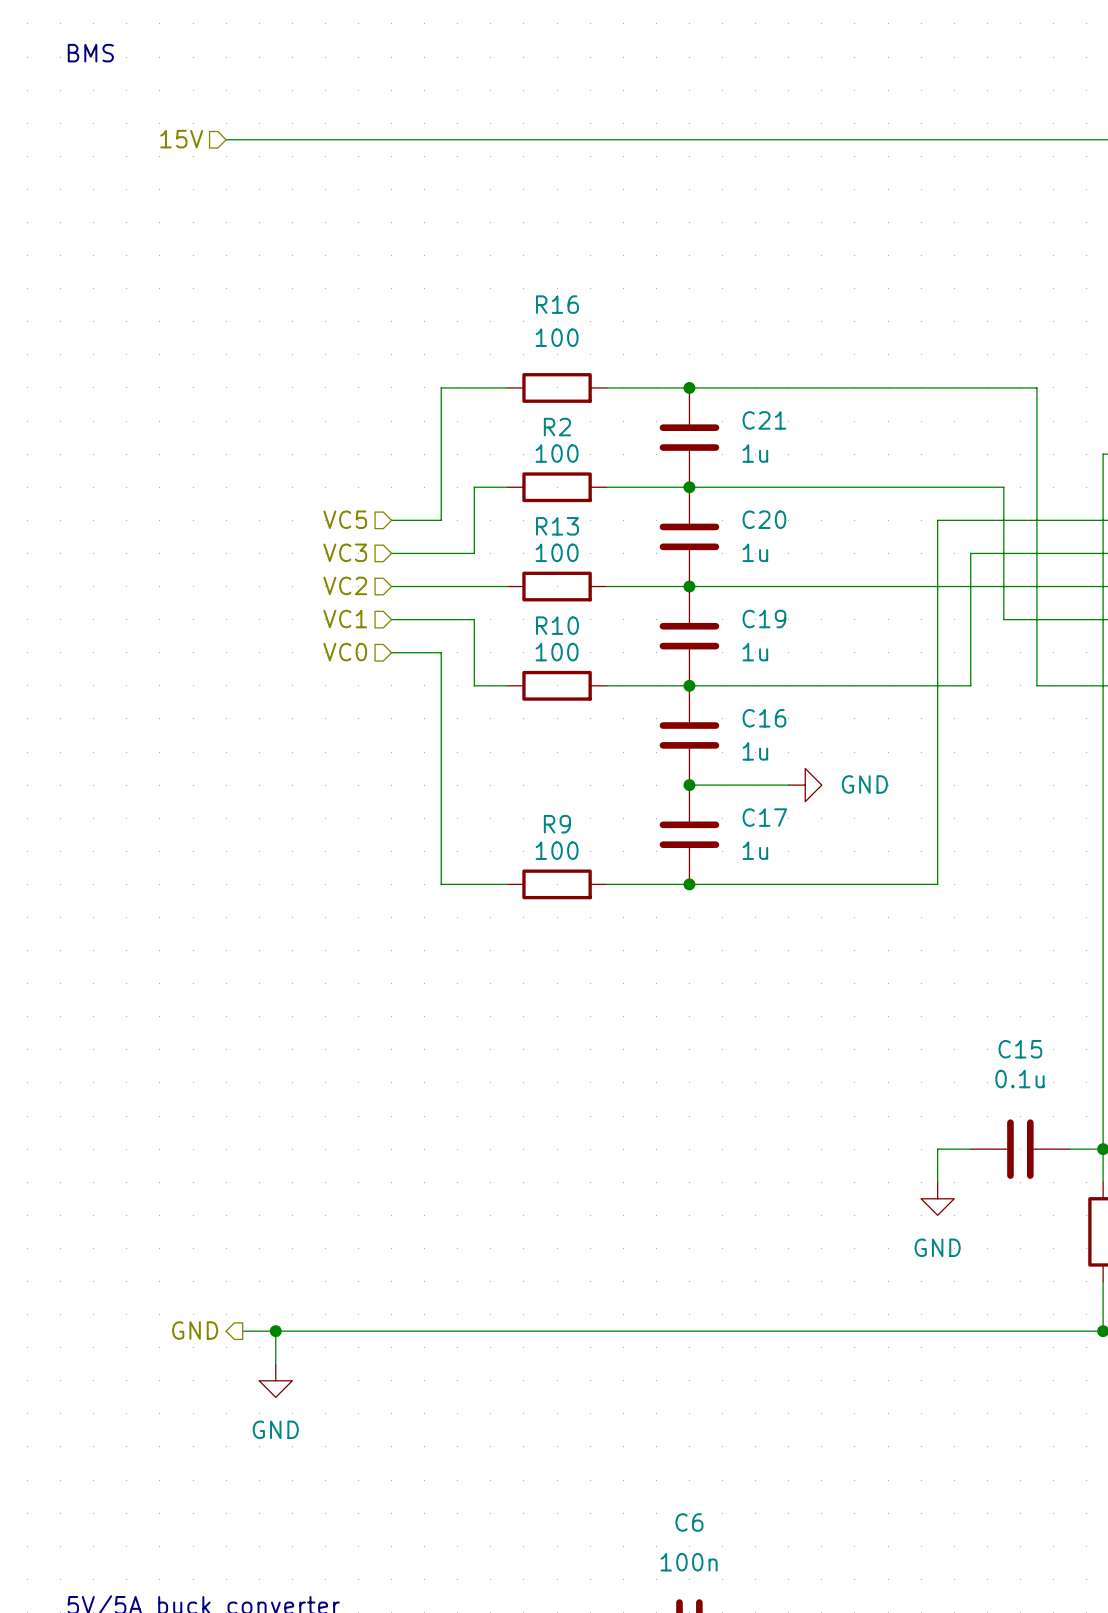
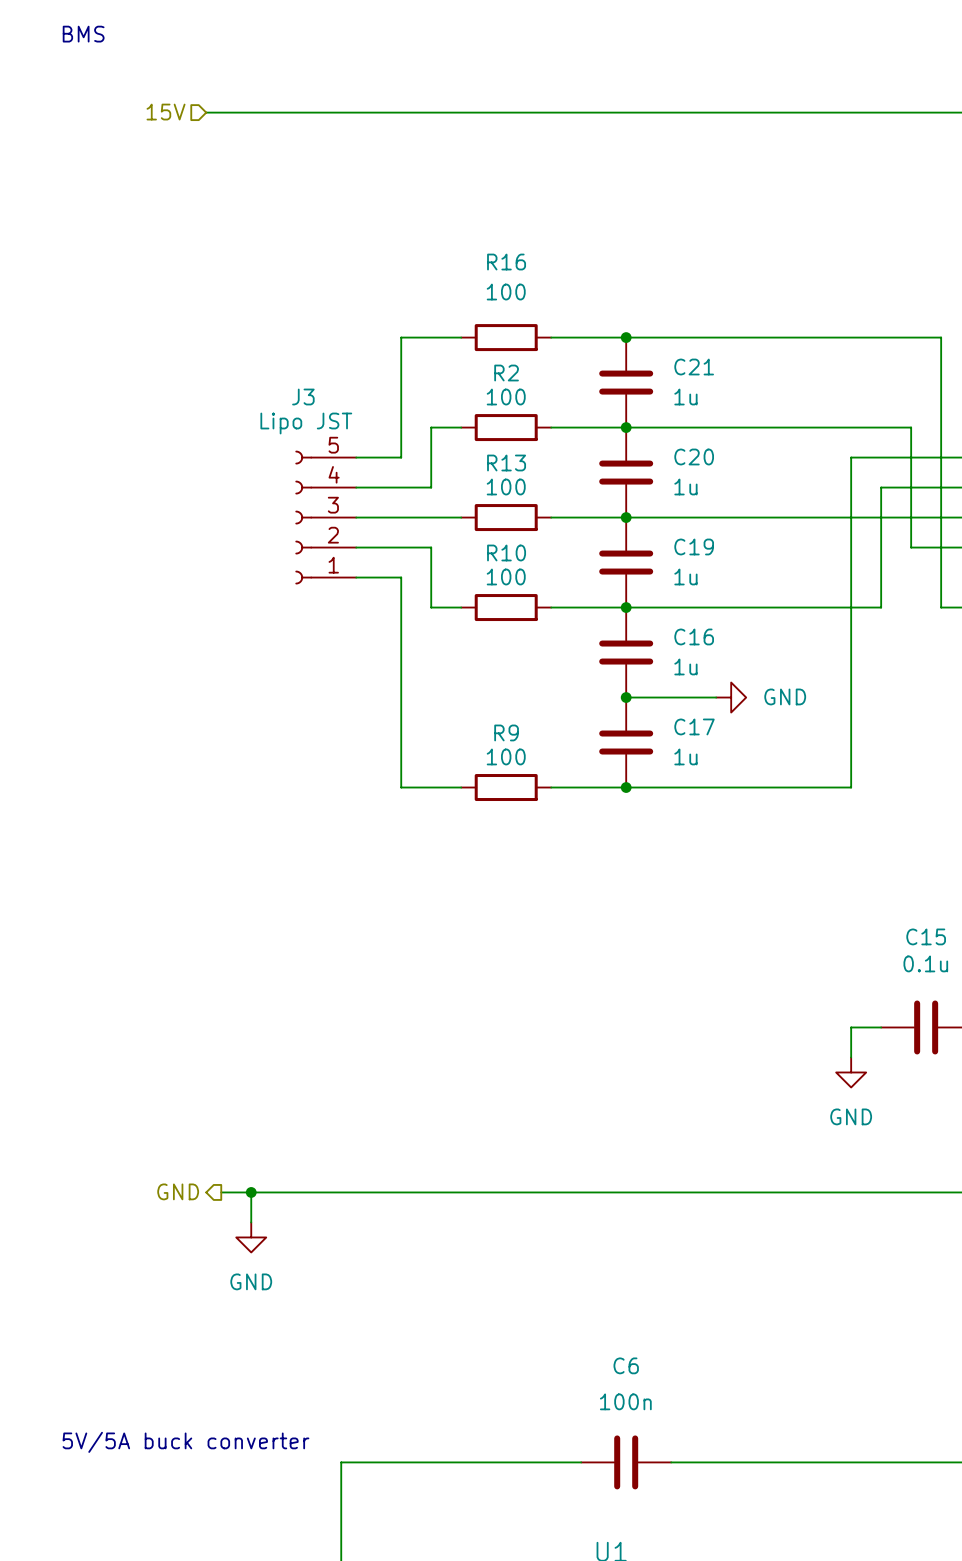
hierarchical label: VC5 (345, 519) -> none
hierarchical label: VC3 (345, 552) -> none
hierarchical label: VC2 (345, 585) -> none
J3: none -> Lipo JST (325, 517)
hierarchical label: VC1 (345, 619) -> none
hierarchical label: VC0 (345, 652) -> none

